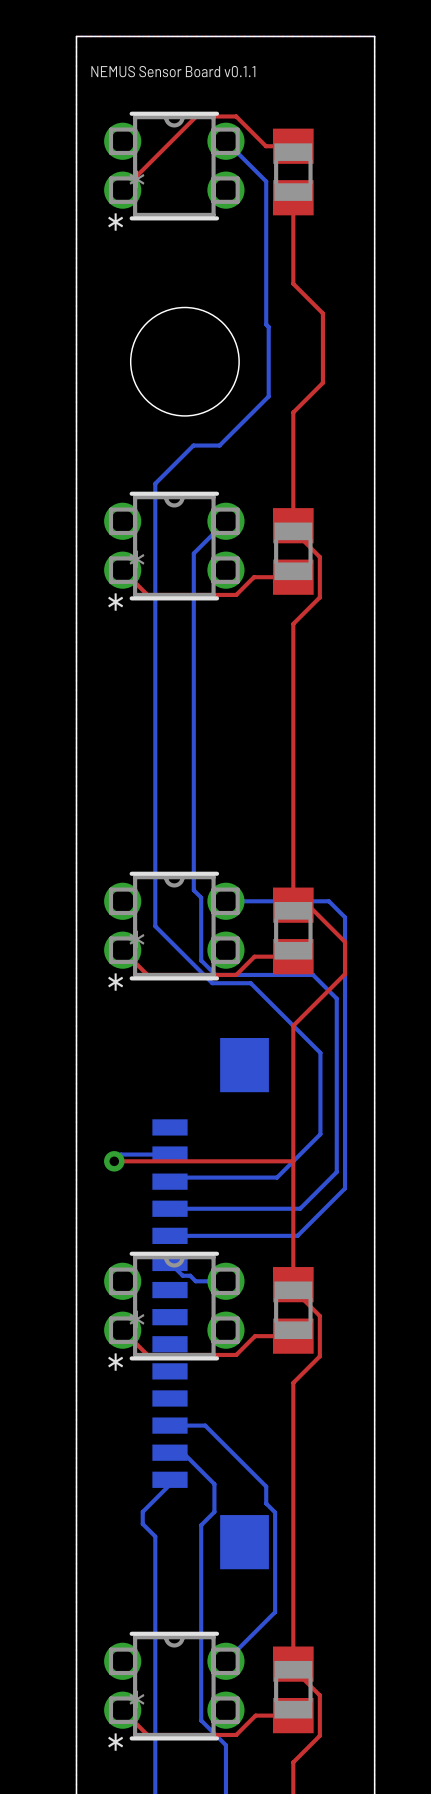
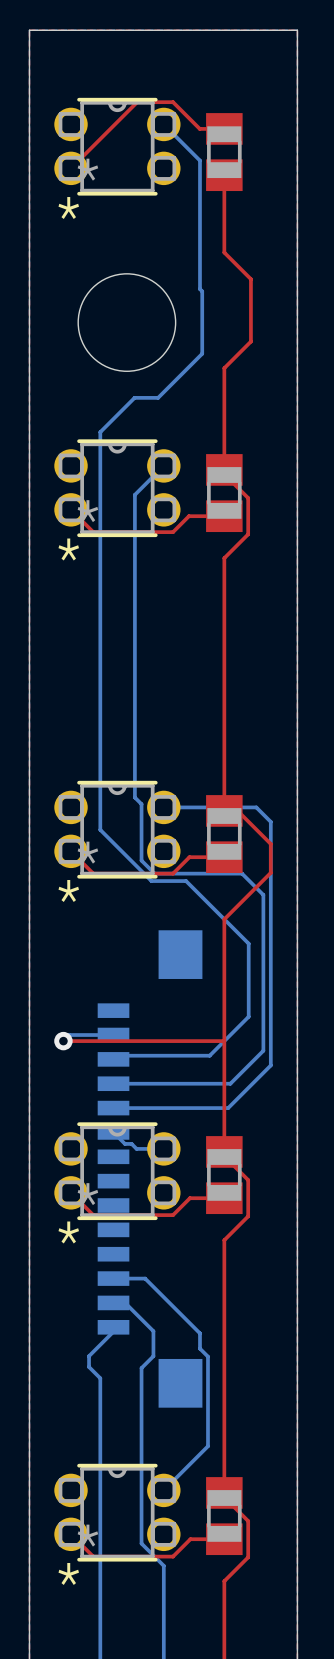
text: NEMUS Sensor Board v0.1.1 (173, 71) -> none

